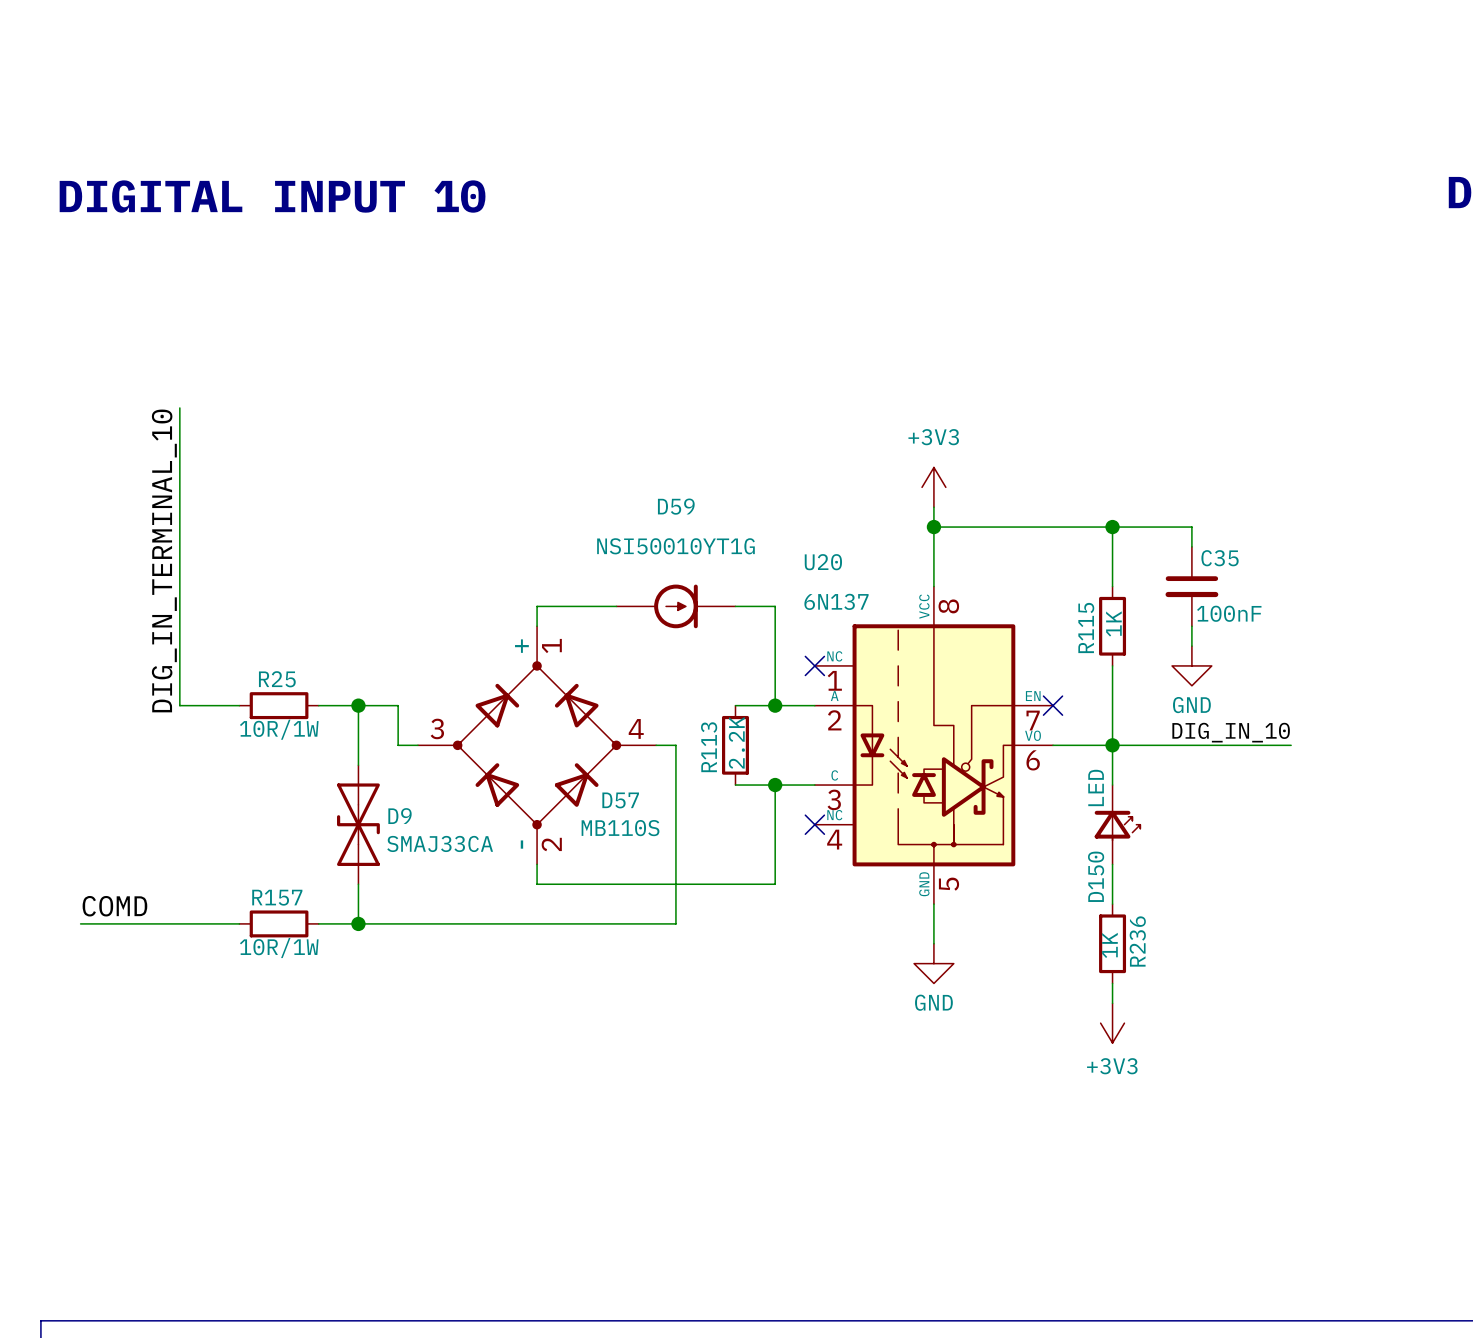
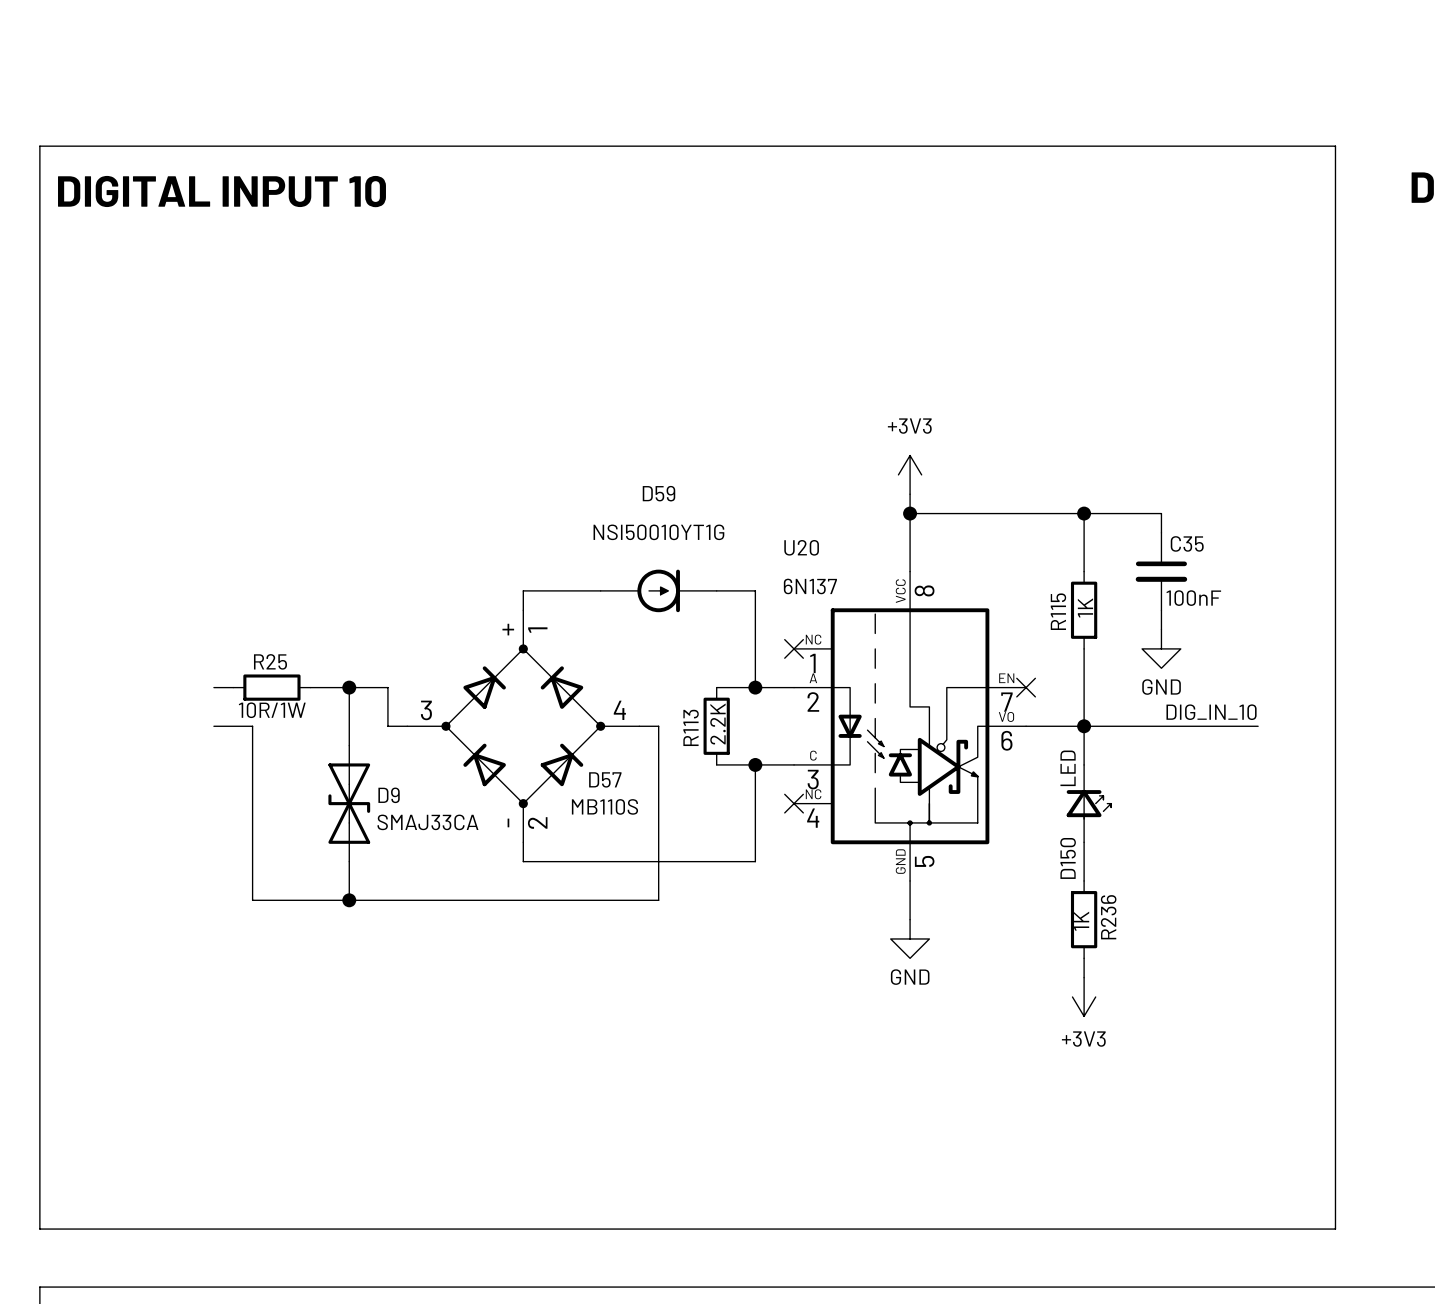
line: none -> (39, 146) (1335, 146) (1335, 1229) (39, 1229) (39, 146)
wire: (179, 407) (179, 705) (219, 705) -> none
label: DIG_IN_TERMINAL_10 (164, 560) -> none
wire: none -> (213, 726) (252, 726) (252, 900) (310, 900)
label: COMD (114, 906) -> none
wire: (80, 923) (239, 923) -> none
R157: 10R/1W (279, 923) -> none

